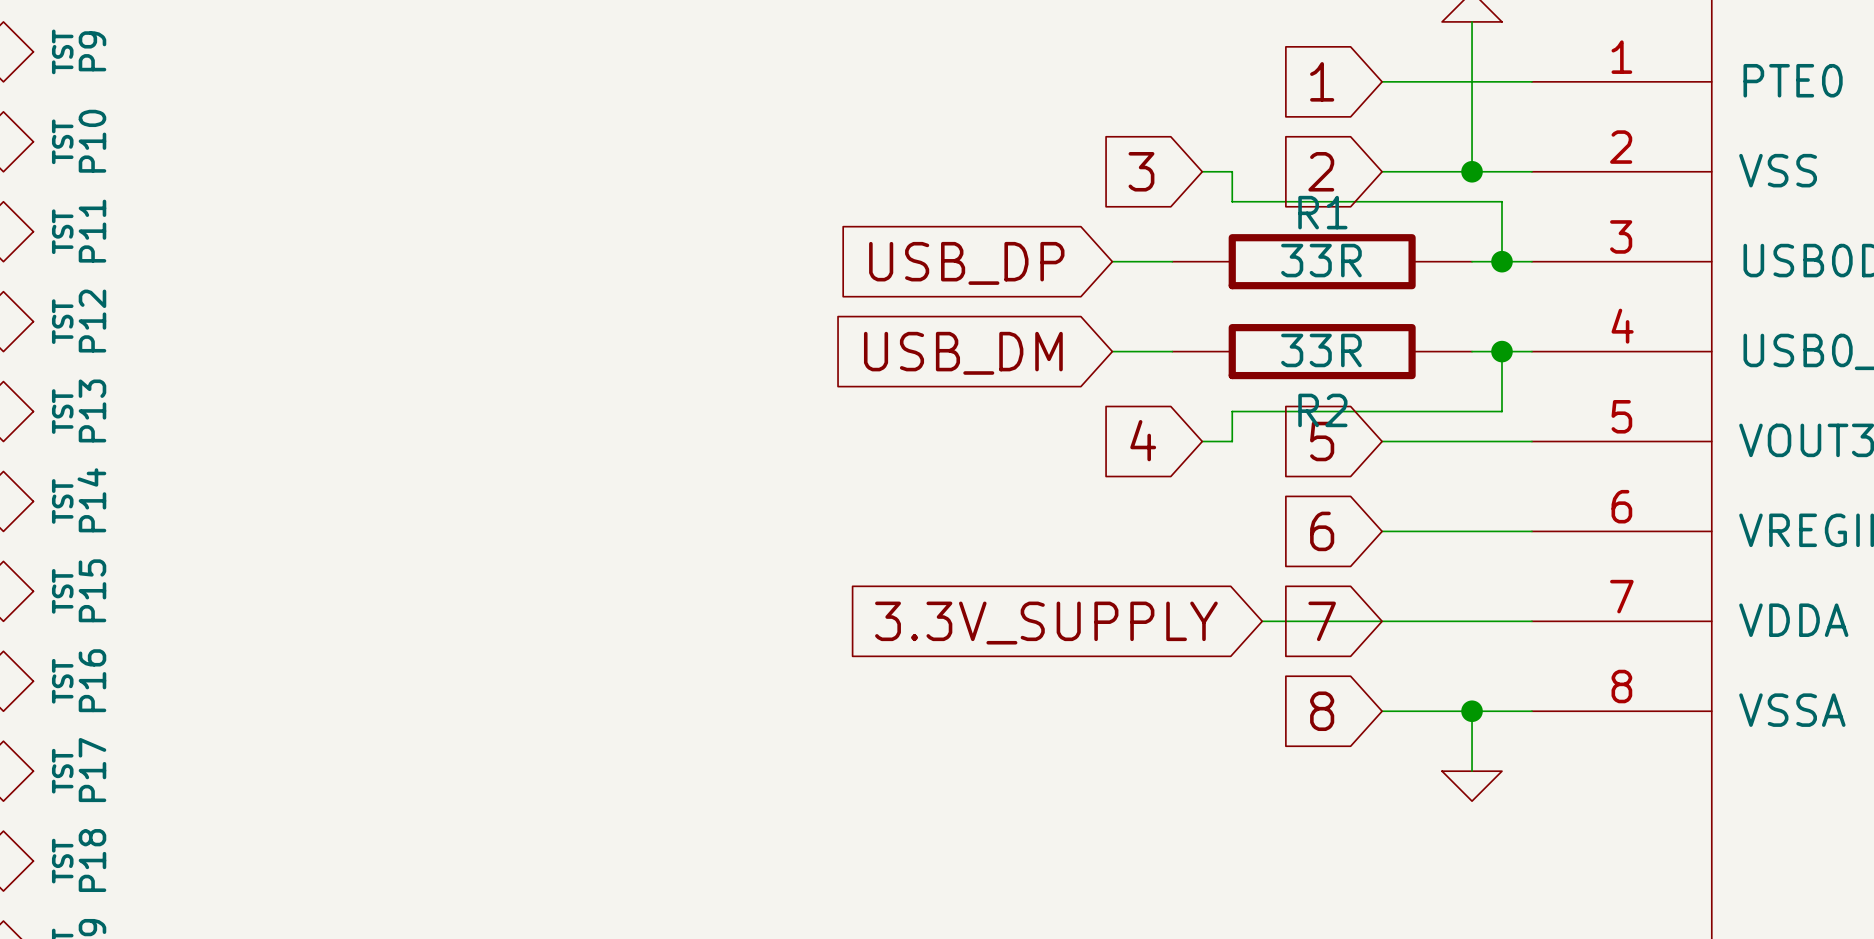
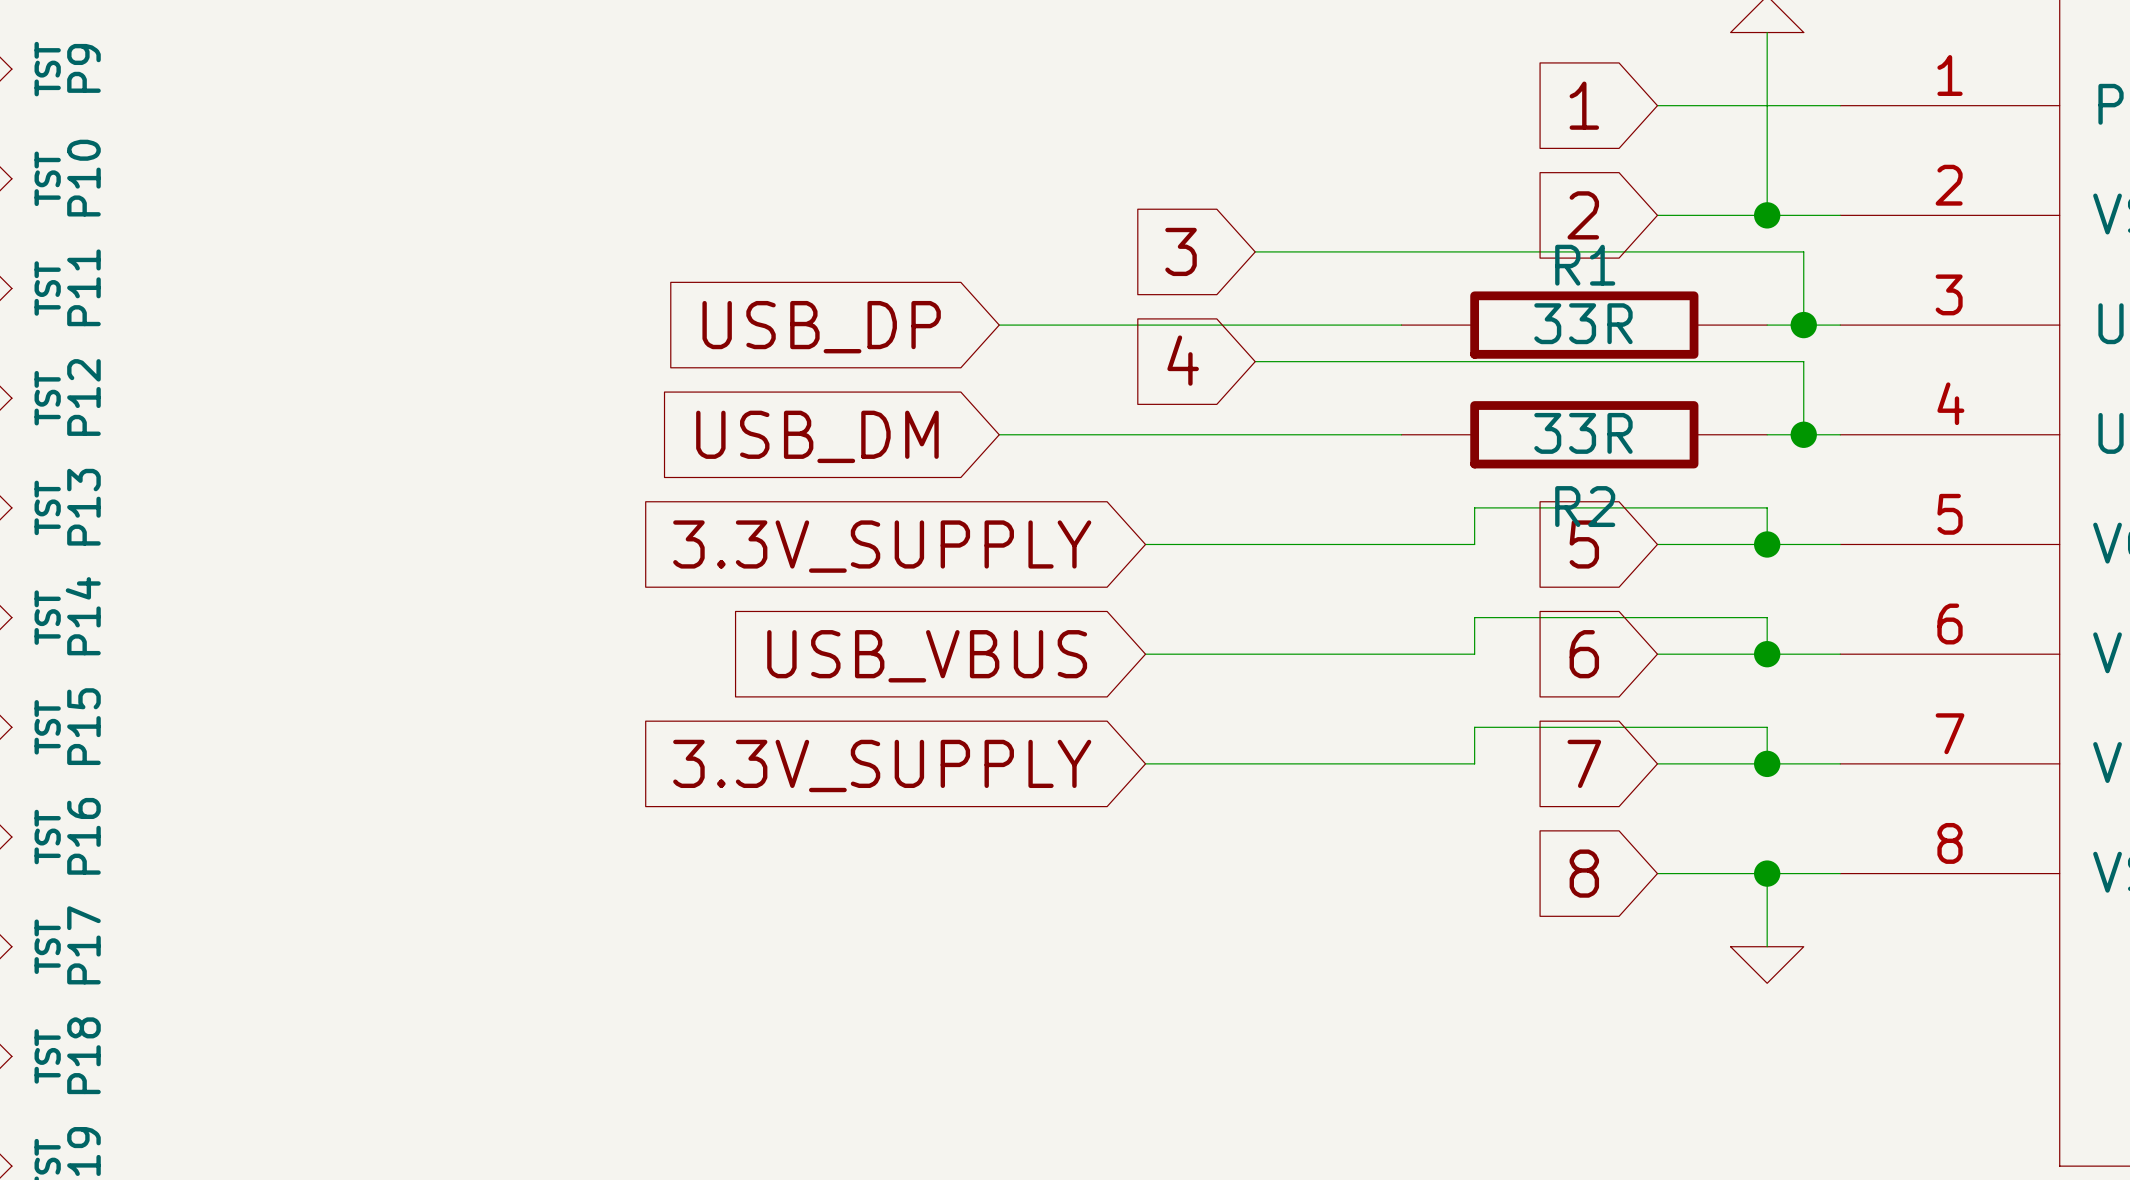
global label position: 3 (1141, 171) -> 3 (1181, 251)
wire: (1202, 171) (1232, 171) (1232, 201) -> (1255, 251) (1474, 251)
wire: none -> (999, 325) (1328, 325)
global label position: USB_DP (966, 263) -> USB_DP (821, 327)
wire: none -> (1255, 361) (1803, 361) (1803, 434)
wire: none -> (999, 434) (1328, 434)
wire: (1501, 351) (1501, 411) (1472, 411) -> (1767, 544) (1767, 507)
global label position: USB_DM (963, 353) -> USB_DM (817, 436)
global label position: 4 (1143, 440) -> 4 (1183, 360)
wire: none -> (1145, 544) (1438, 544)
junction: none -> (1767, 544)
global label: none -> 3.3V_SUPPLY (882, 546)
wire: none -> (1145, 654) (1474, 654) (1474, 617) (1767, 617) (1767, 654)
junction: none -> (1767, 654)
global label: none -> USB_VBUS (927, 656)
wire: none -> (1145, 763) (1474, 763) (1474, 727) (1767, 727) (1767, 763)
wire: (1262, 621) (1382, 621) -> none
junction: none -> (1767, 763)
global label position: 3.3V_SUPPLY (1046, 623) -> 3.3V_SUPPLY (882, 765)

